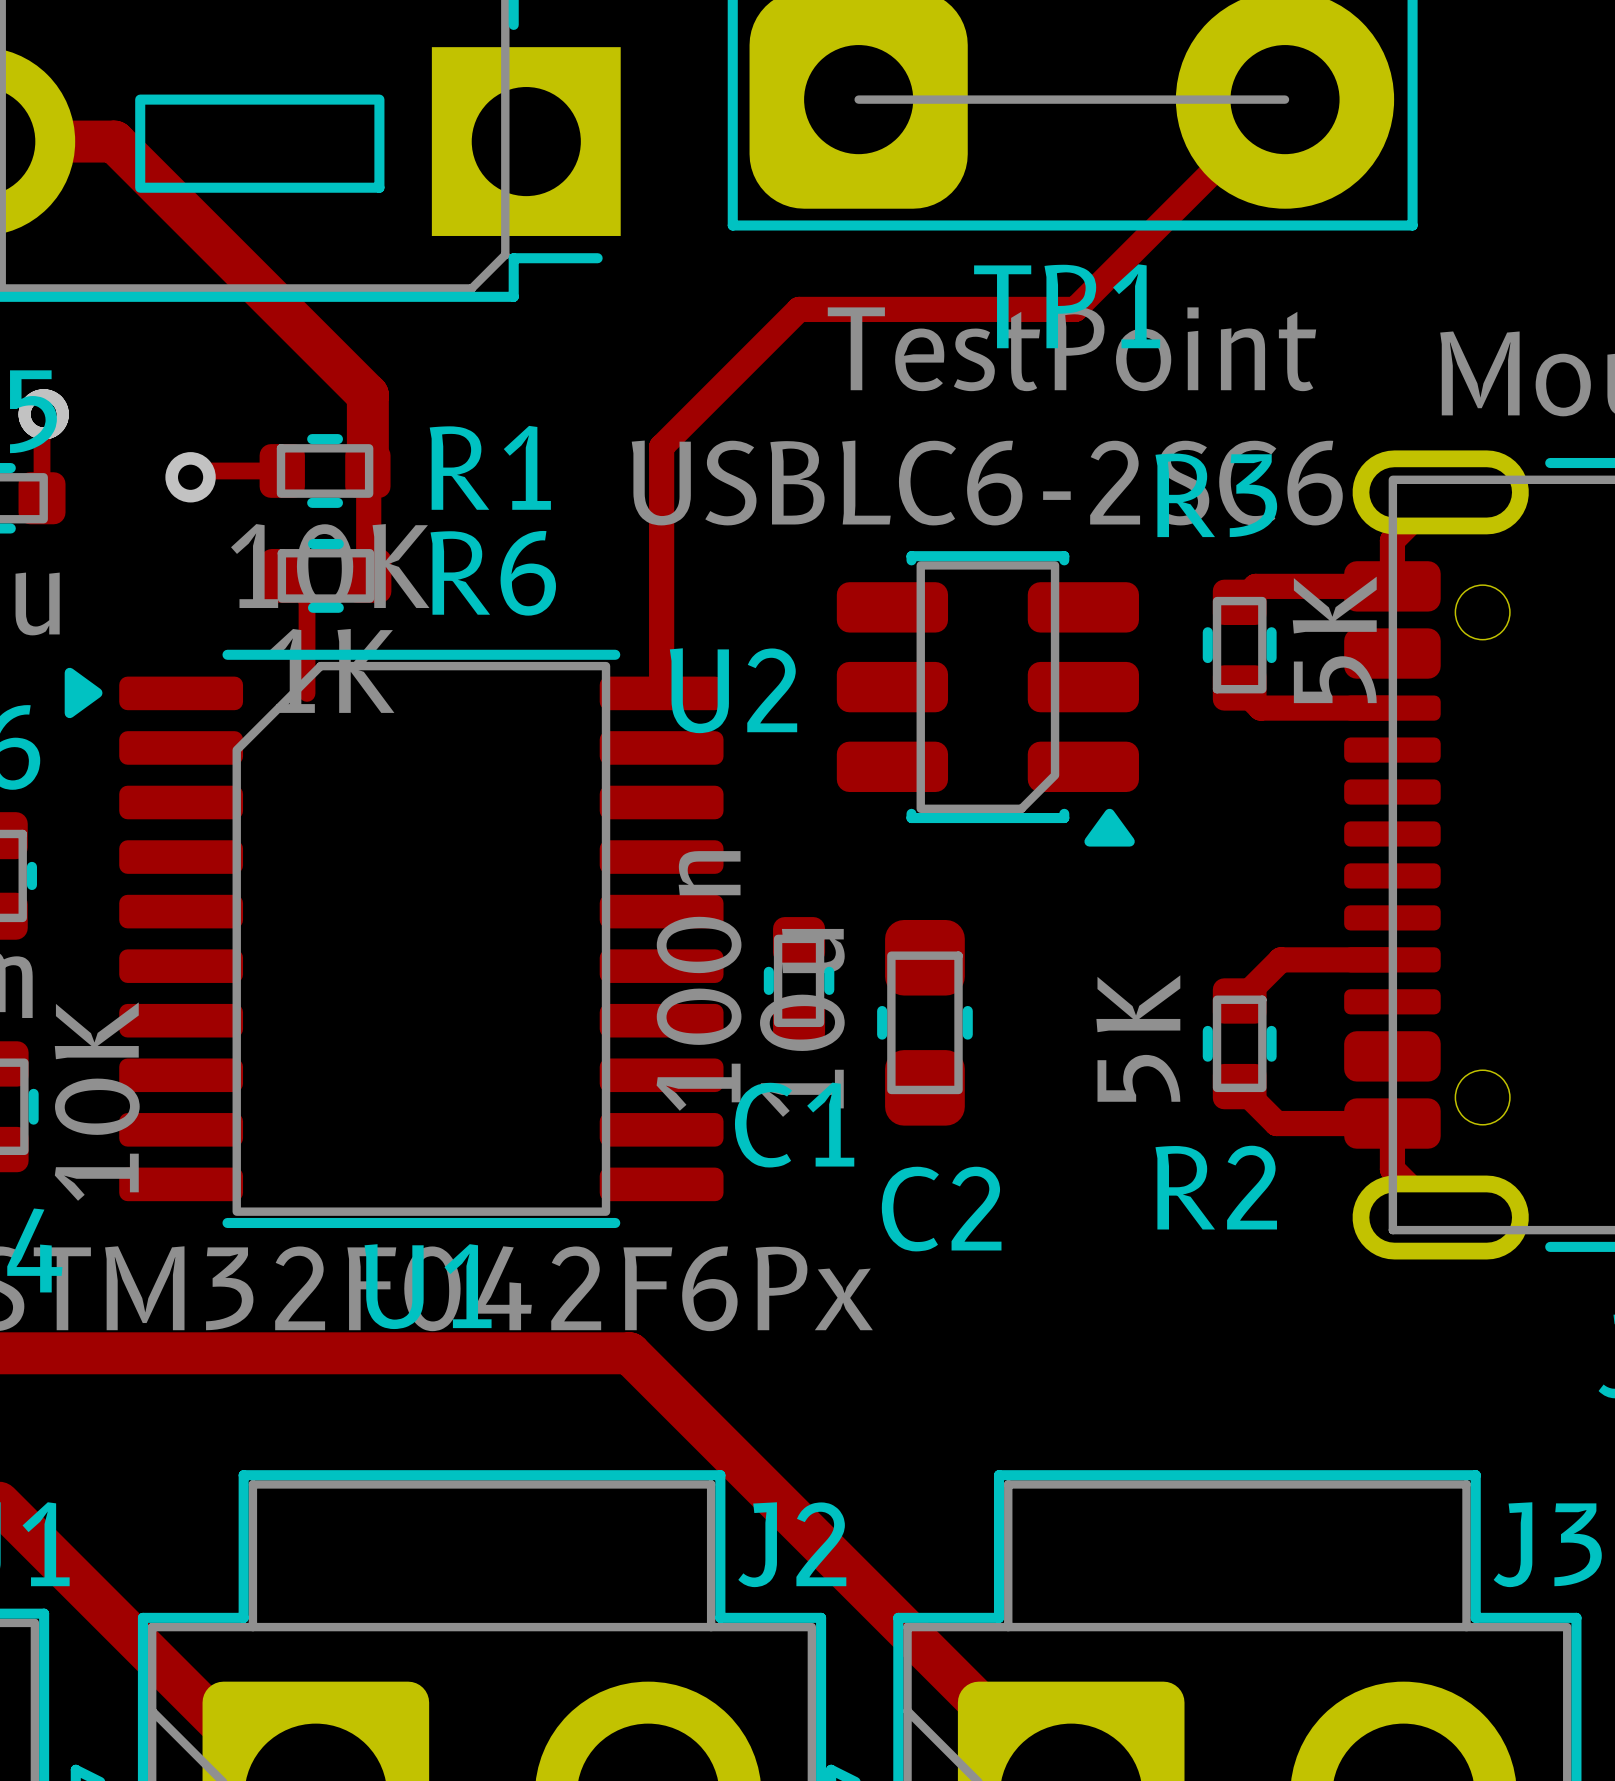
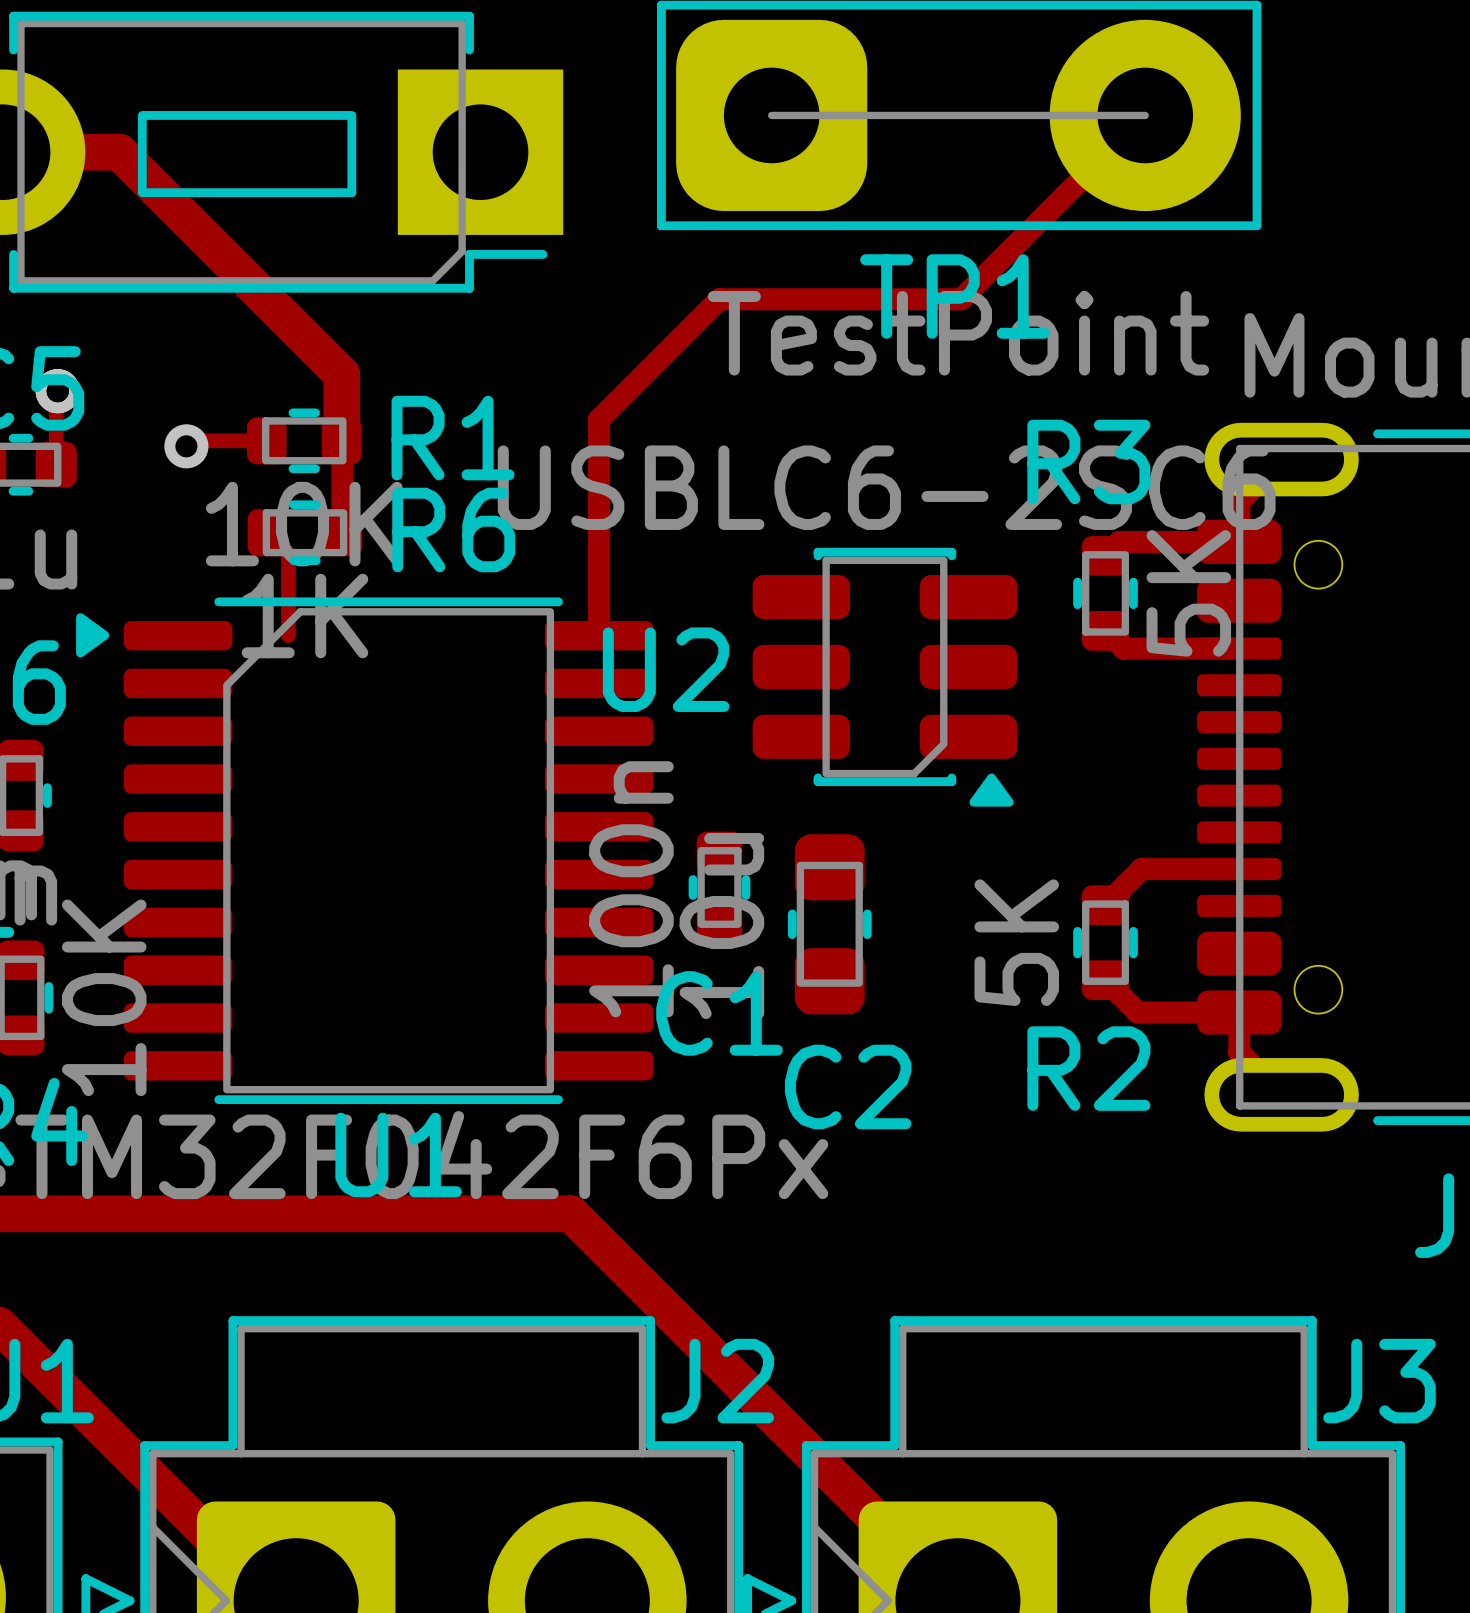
U2 position: (987, 698) -> (884, 677)

